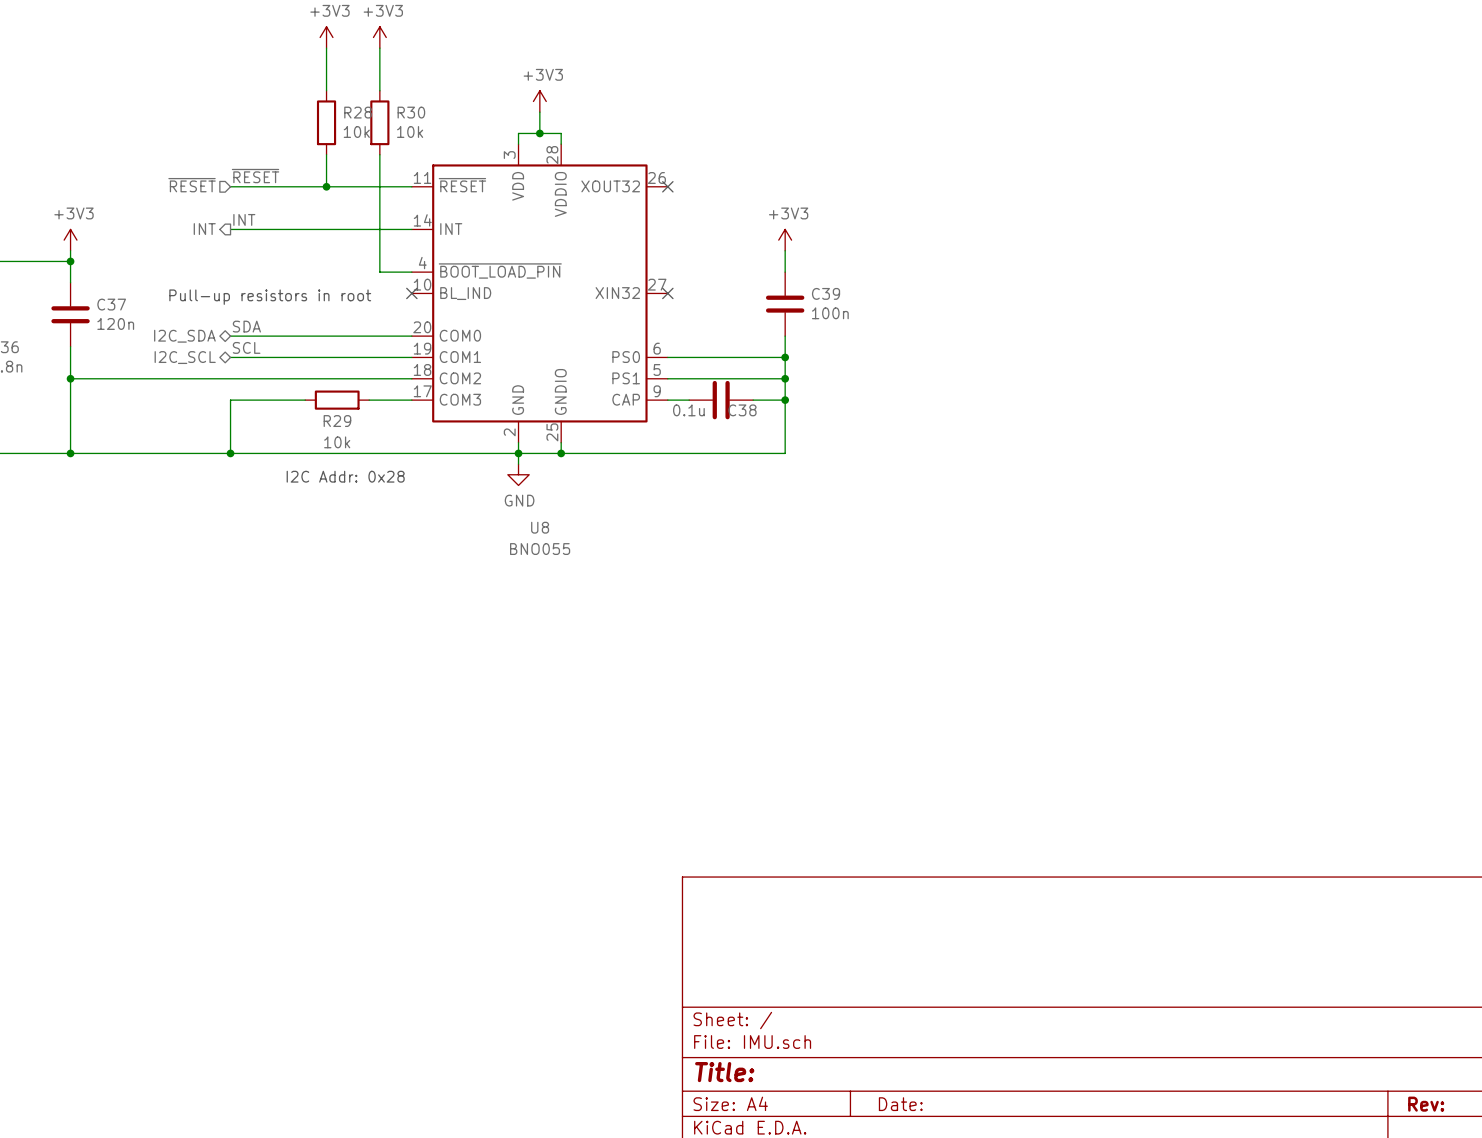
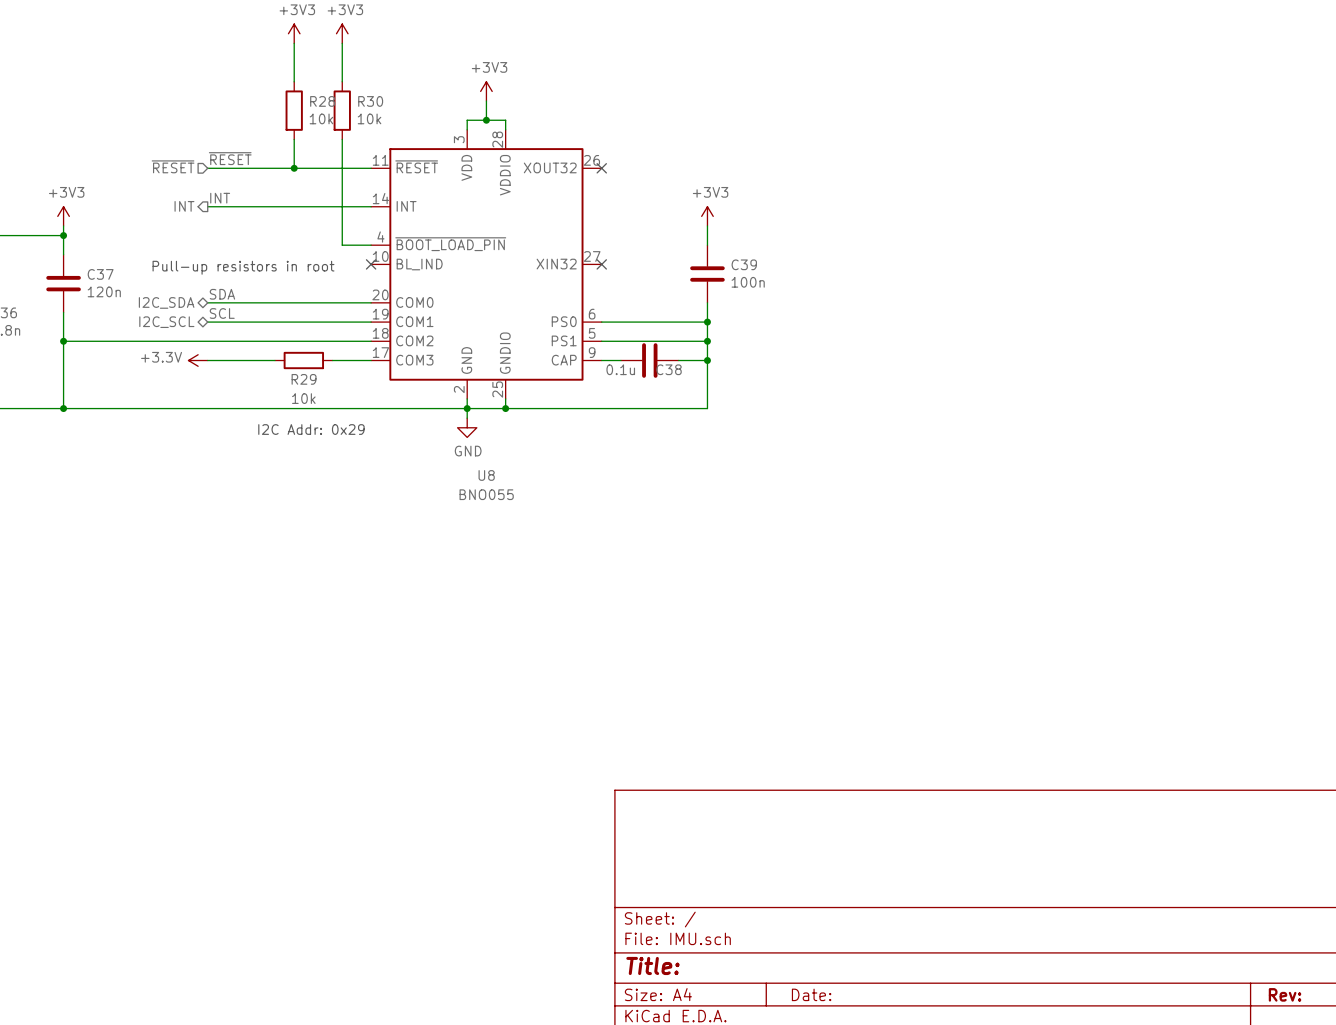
power symbol: none -> +3.3V (198, 360)
wire: (230, 400) (230, 453) -> none
junction: (230, 453) -> none
text: I2C Addr: 0x28 (345, 476) -> I2C Addr: 0x29 (311, 429)

